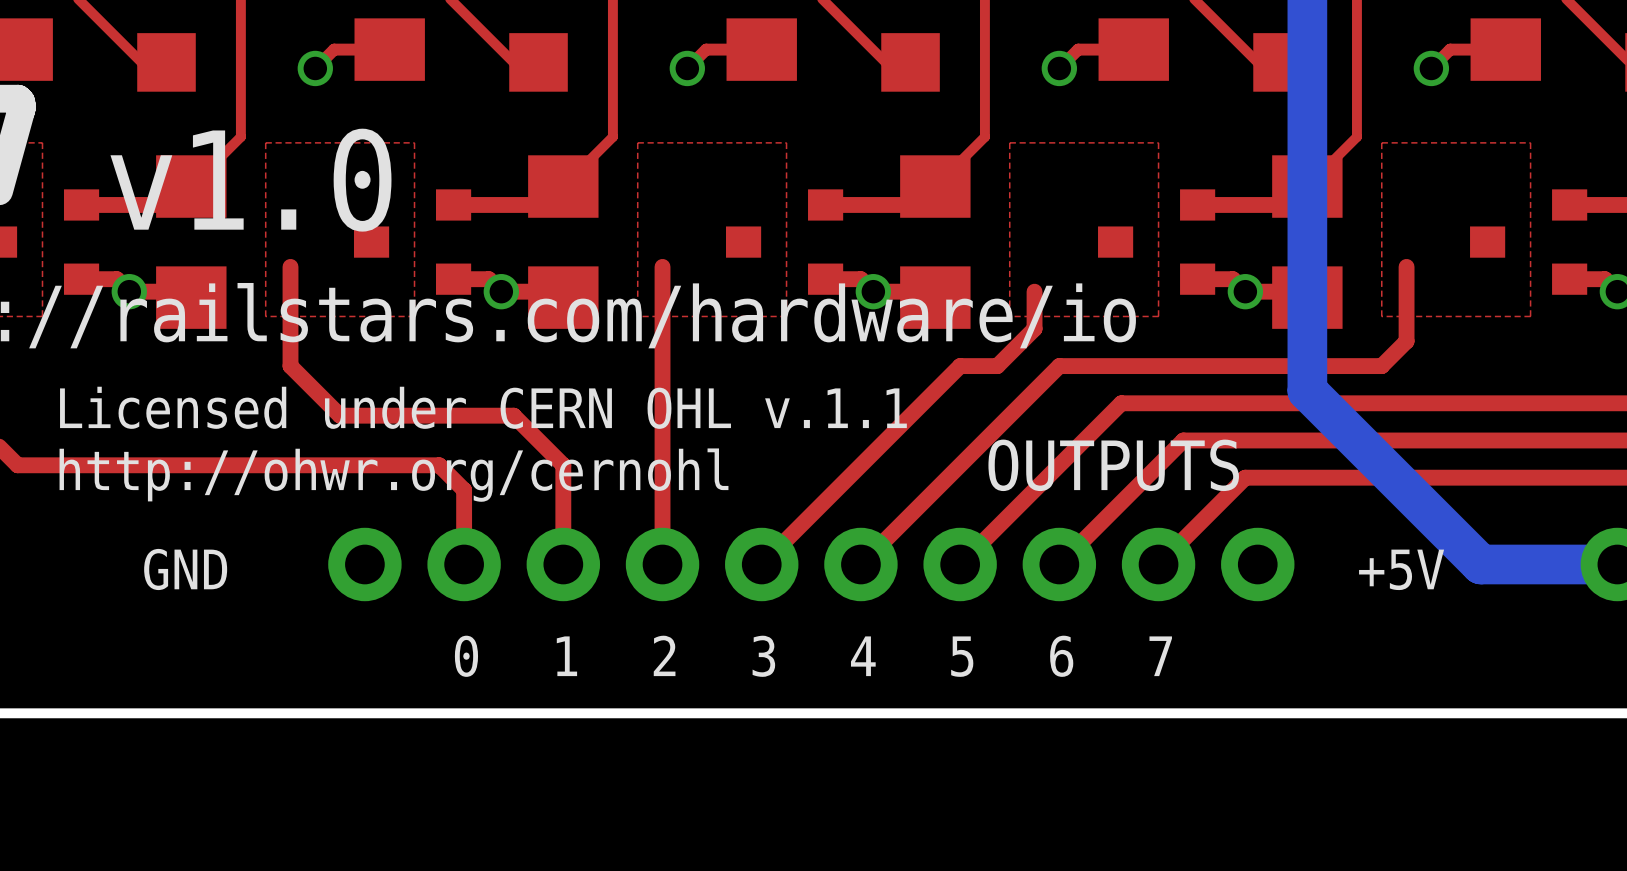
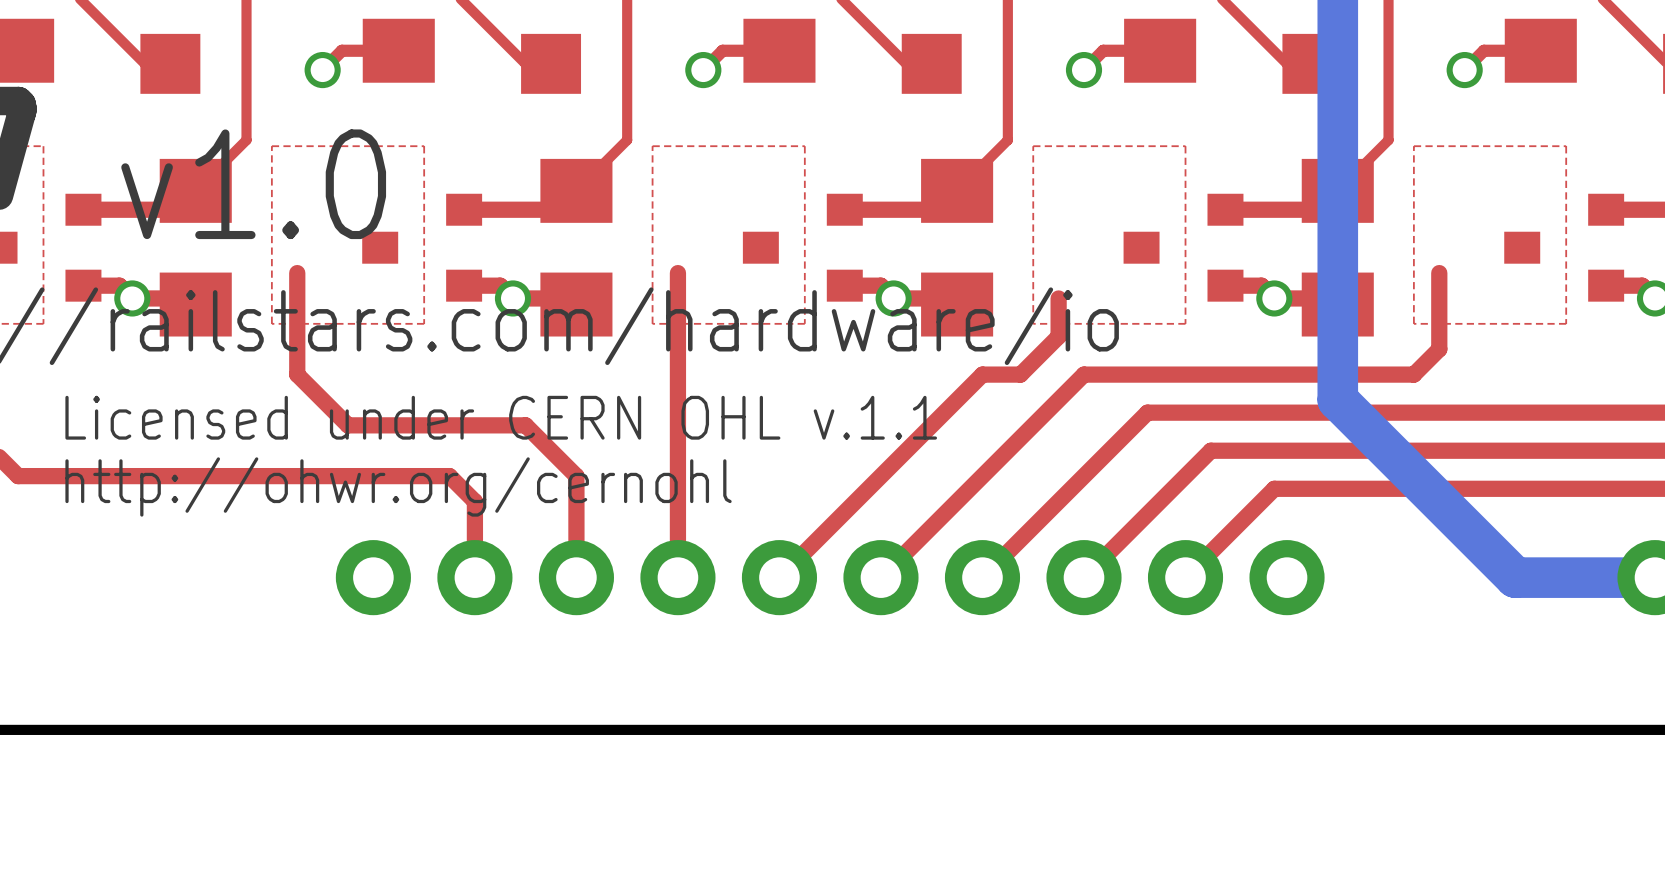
text: OUTPUTS (1113, 465) -> none
text: GND (185, 569) -> none
text: +5V (1401, 569) -> none
text: 2 (664, 655) -> none
text: 0 (466, 656) -> none
text: 1 (566, 656) -> none
text: 3 (763, 656) -> none
text: 4 (863, 656) -> none
text: 5 (962, 656) -> none
text: 6 (1061, 656) -> none
text: 7 (1160, 656) -> none

